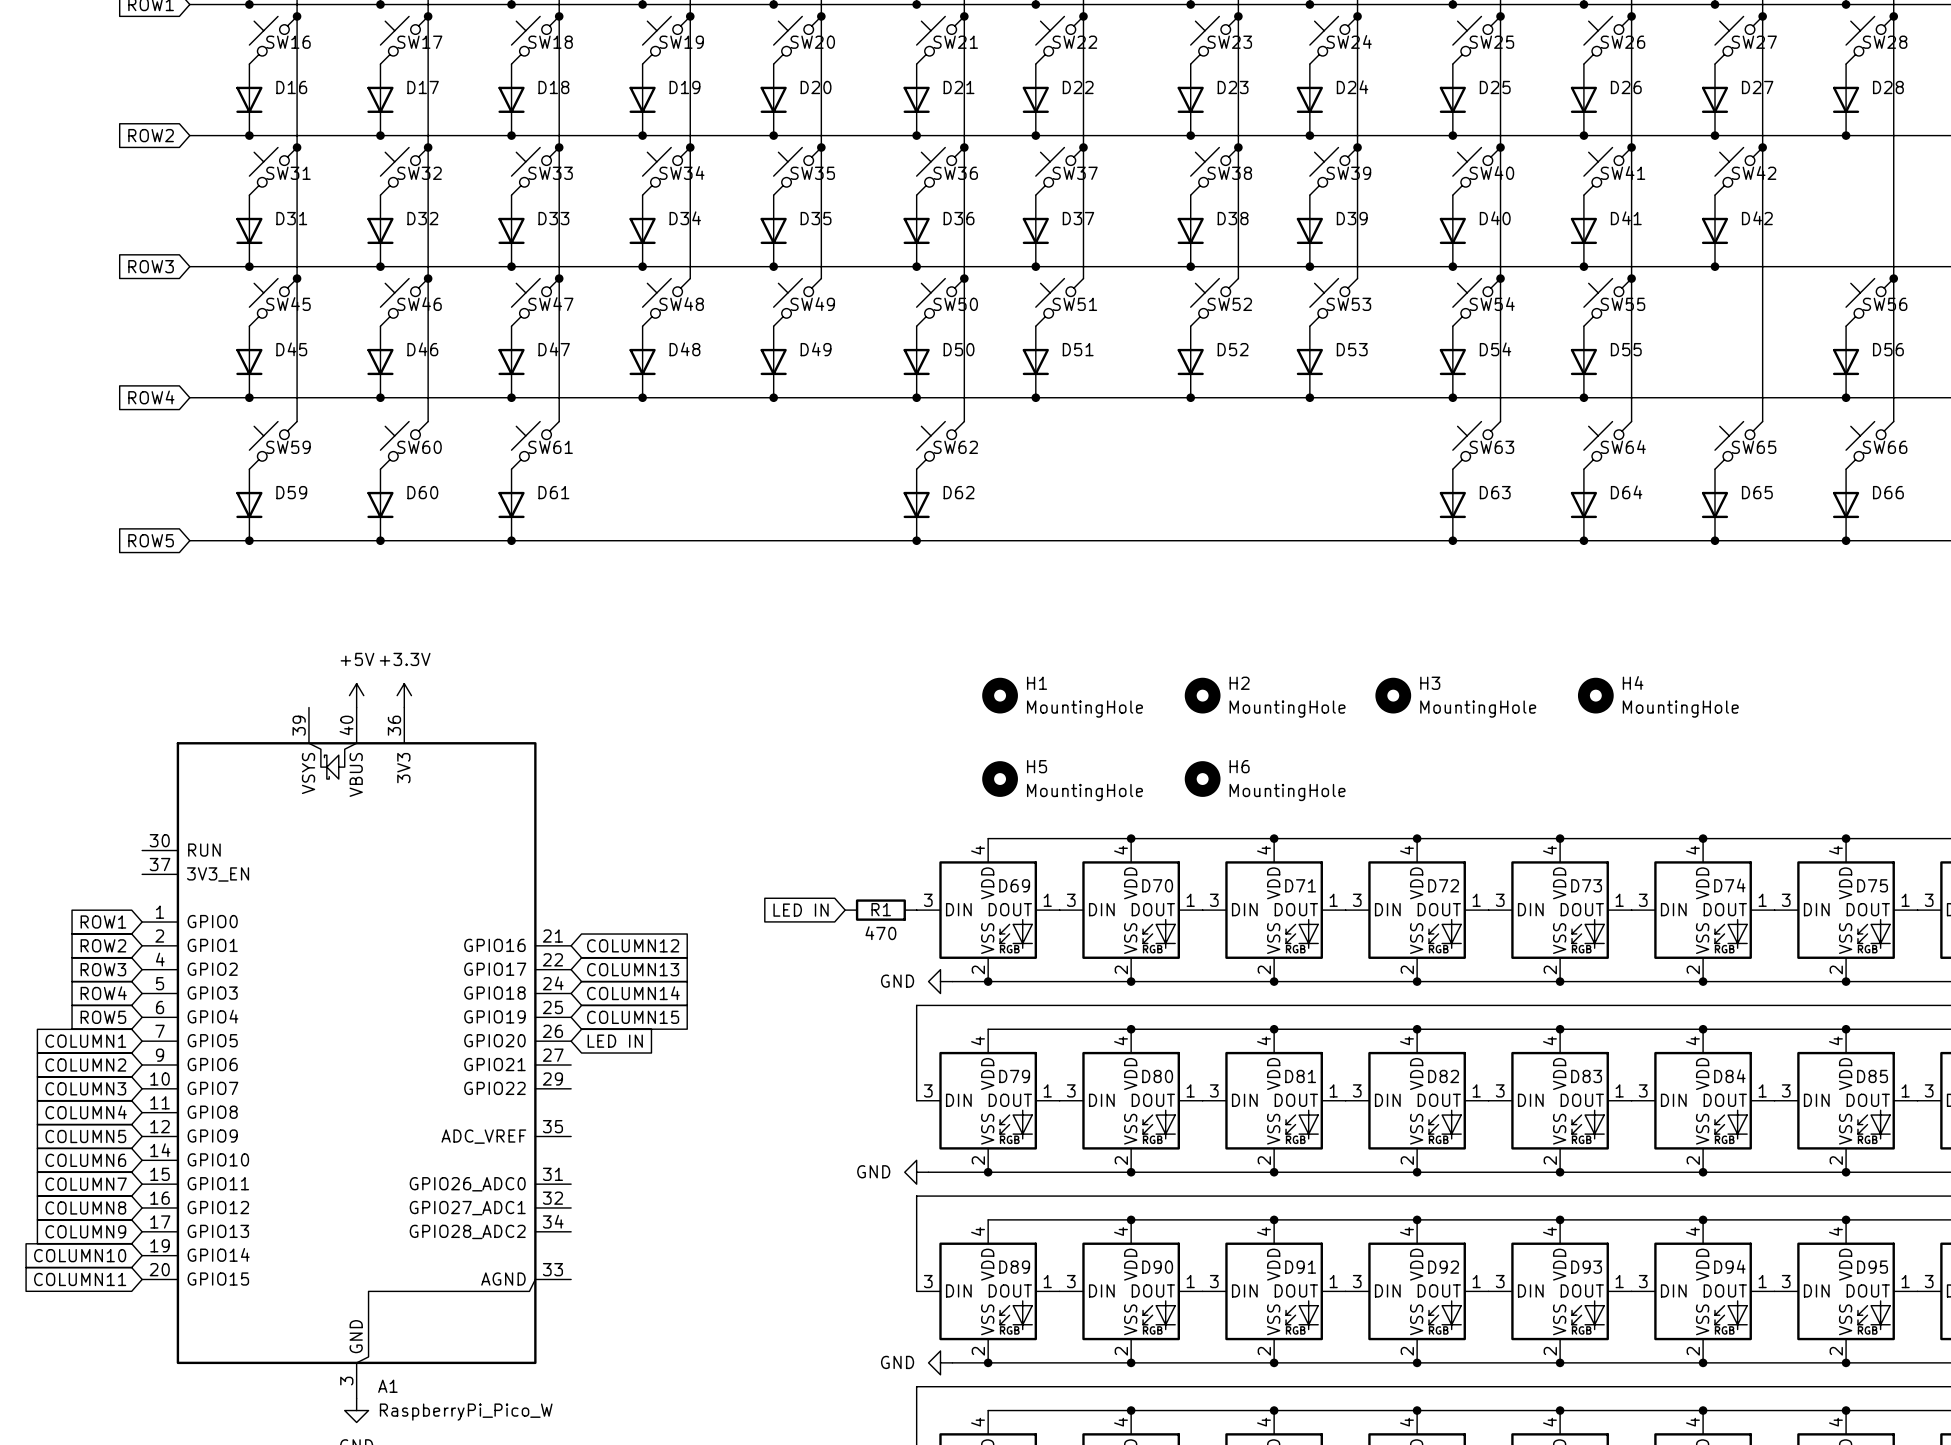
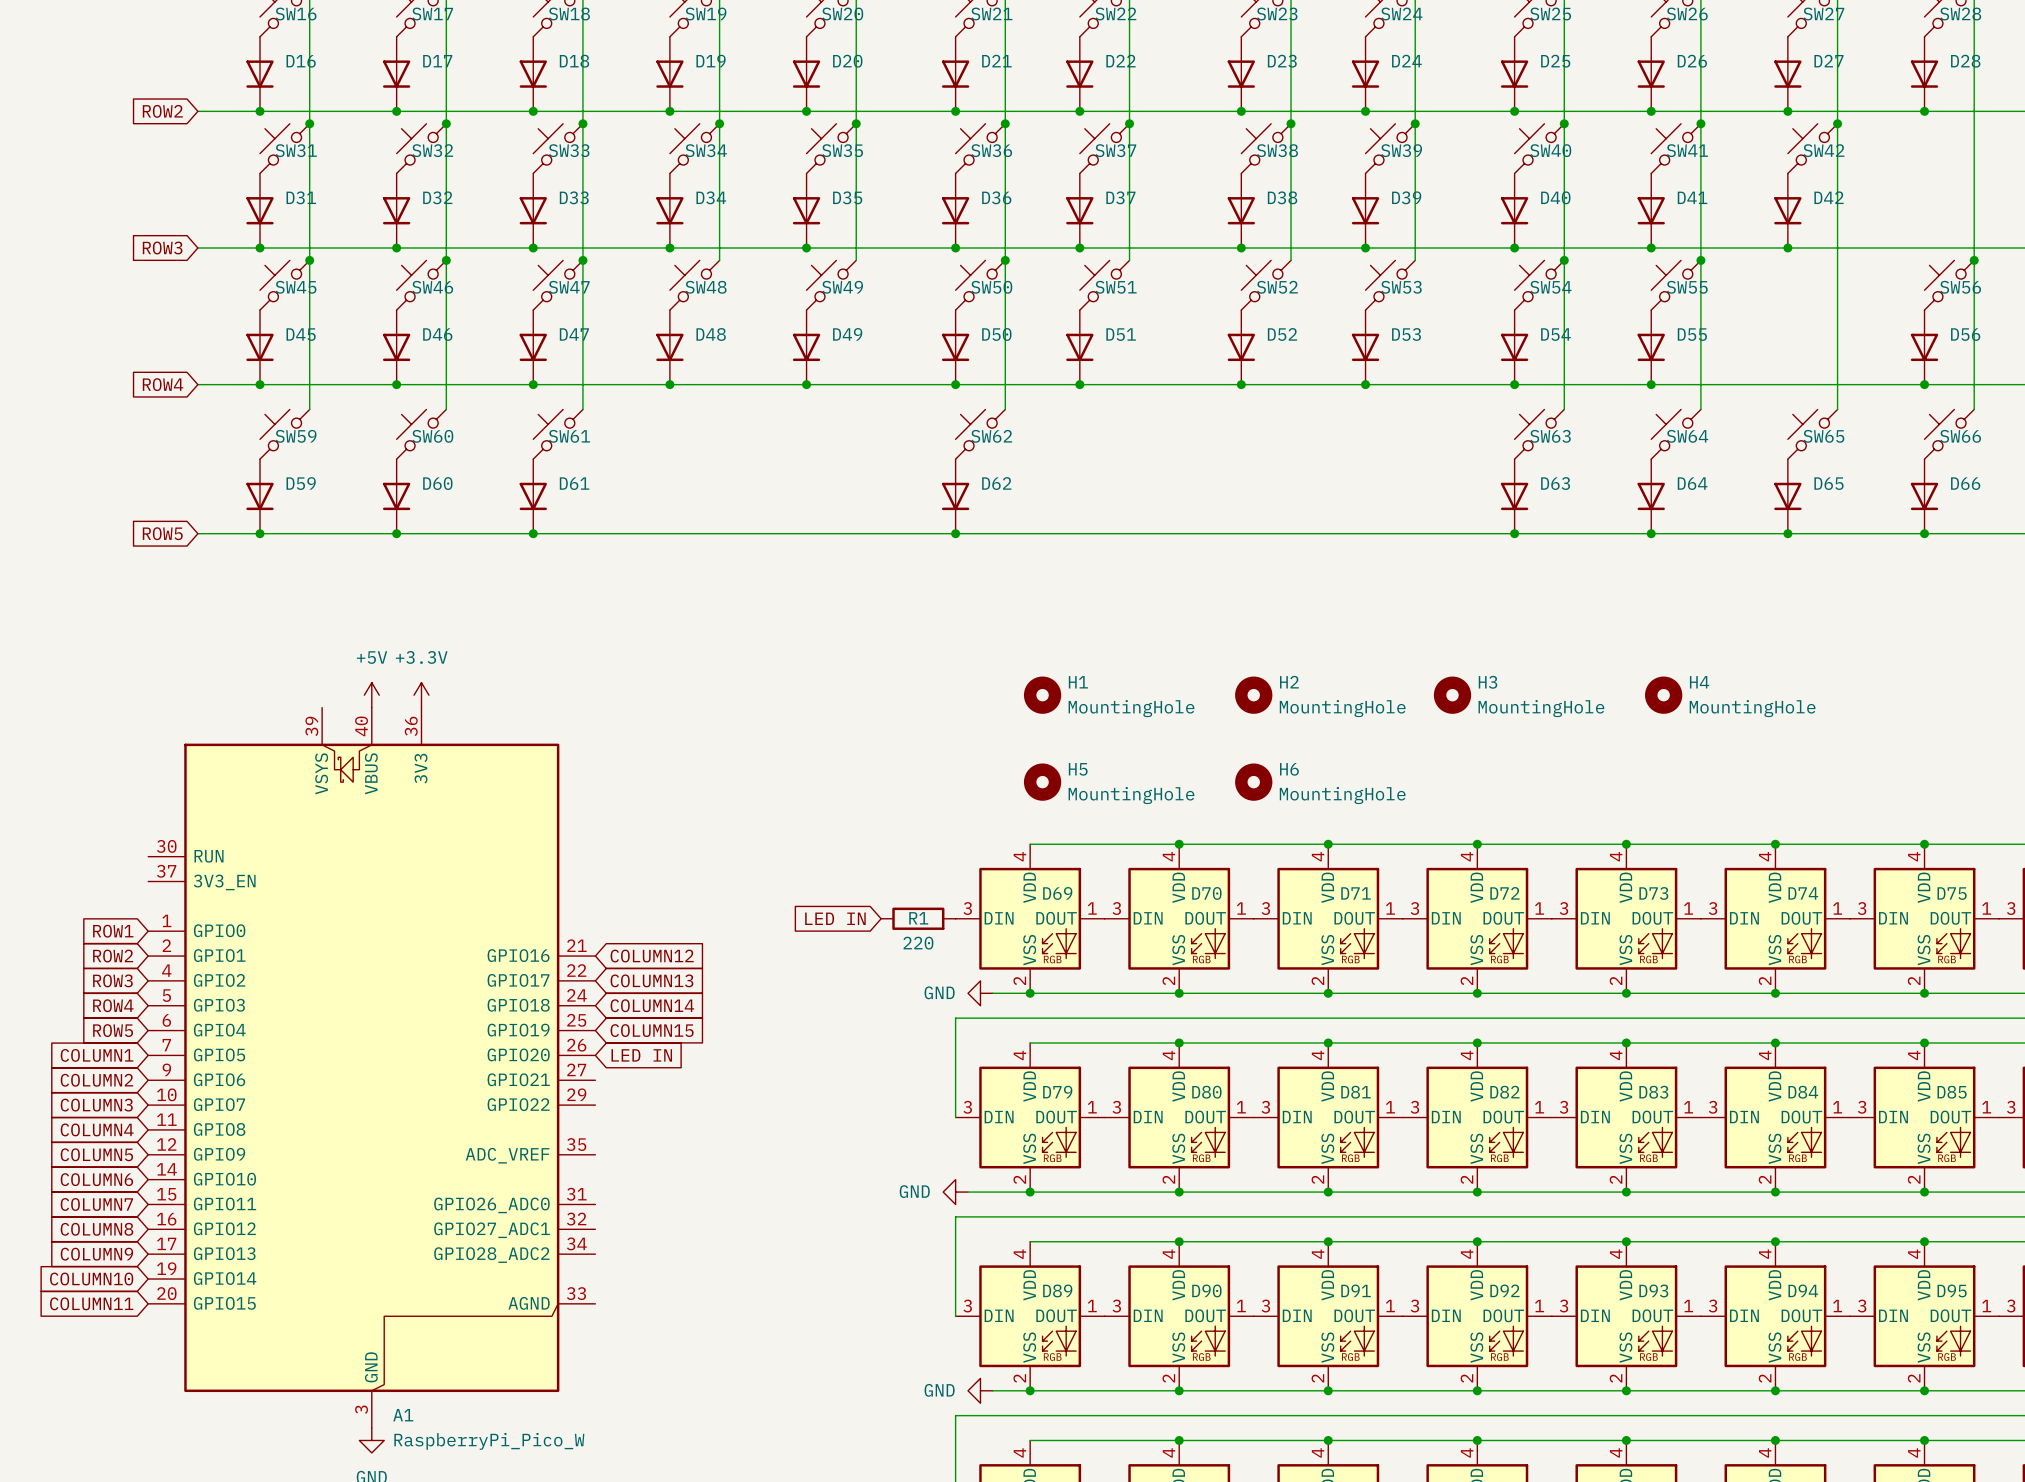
R1 value: 470 (880, 933) -> 220 (918, 943)

